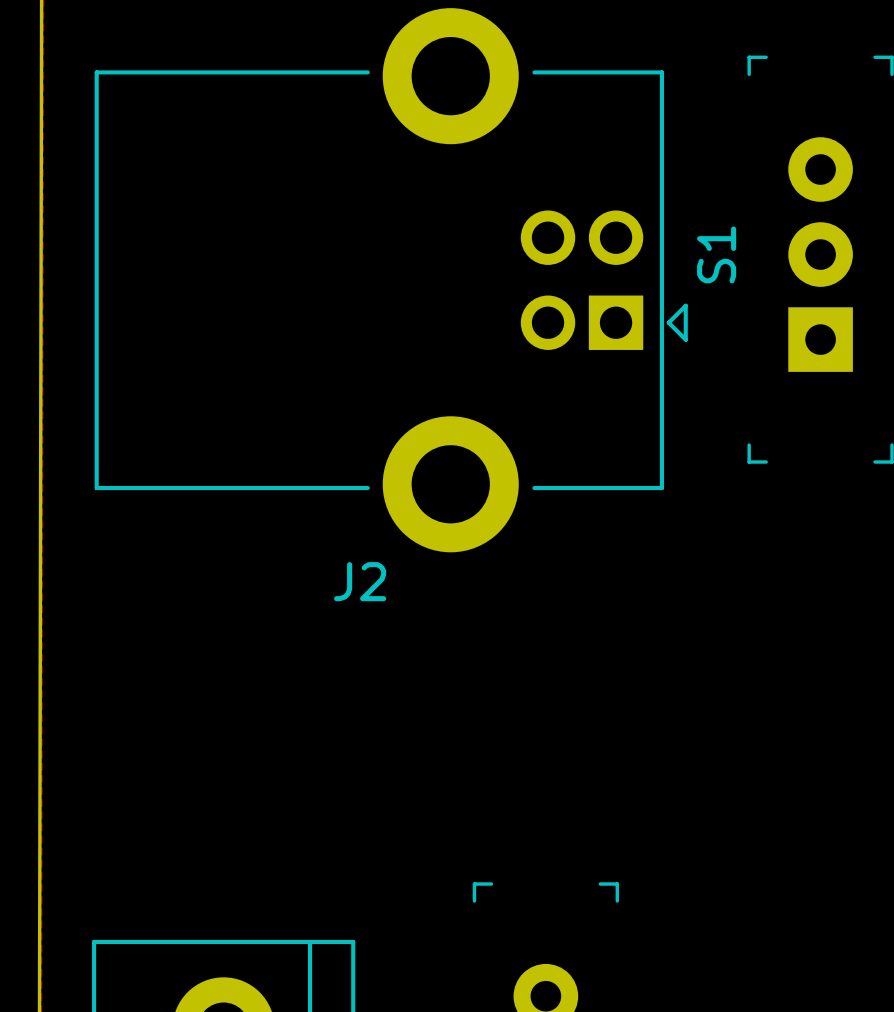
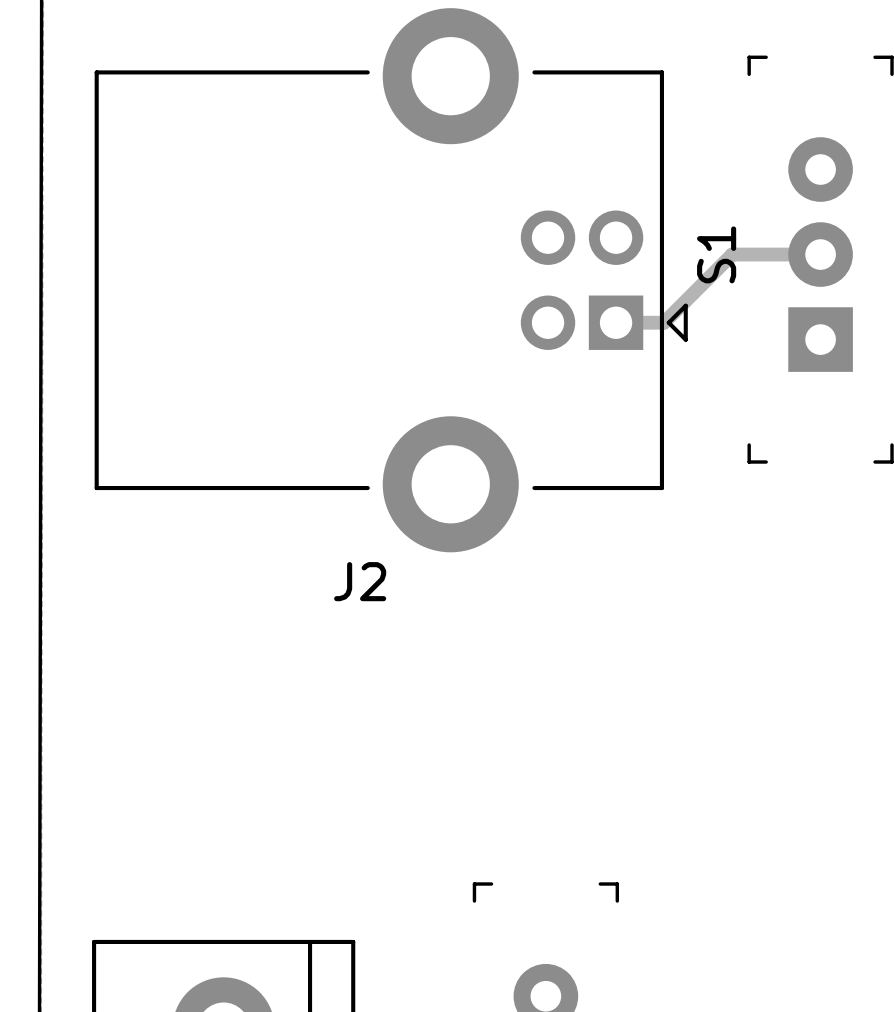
track: none -> (820, 254) (732, 254) (663, 322) (616, 322)

